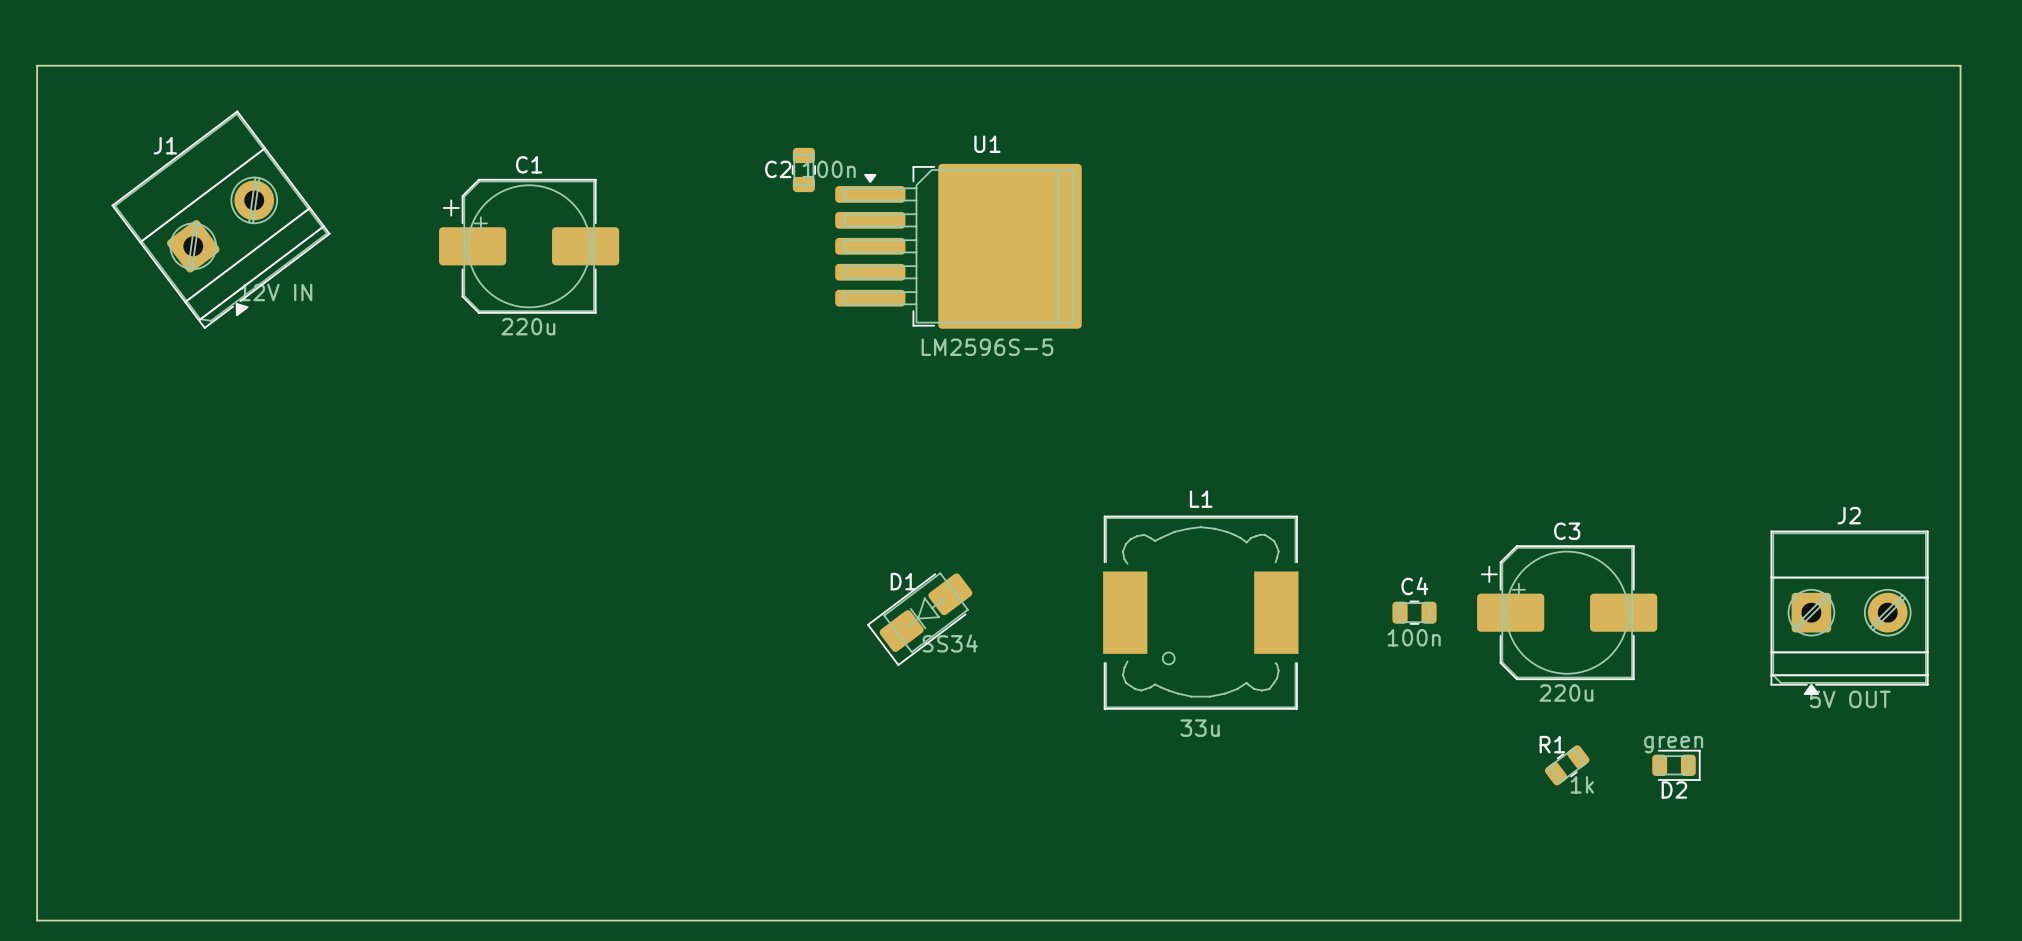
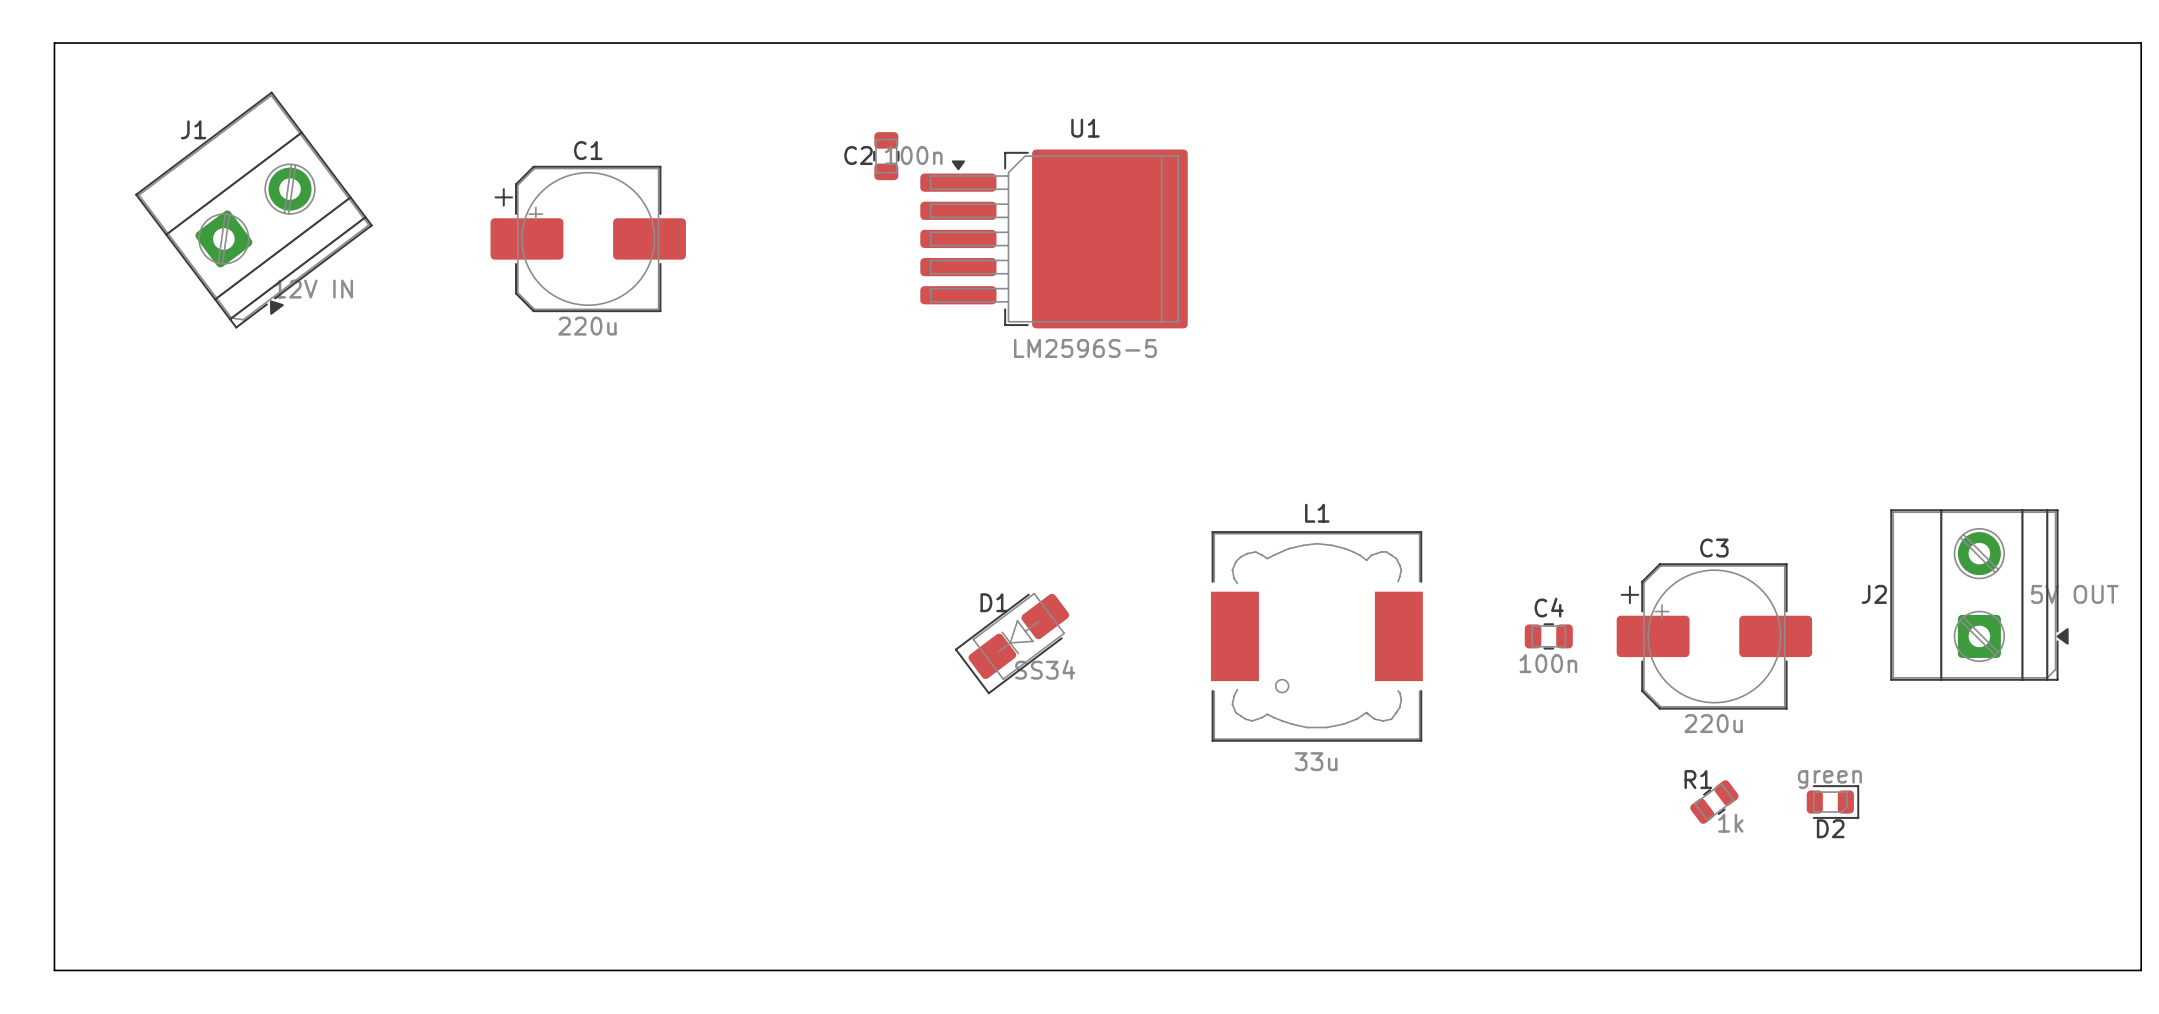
J2 rotation: 0° (1849, 612) -> 90° counterclockwise (1979, 595)

